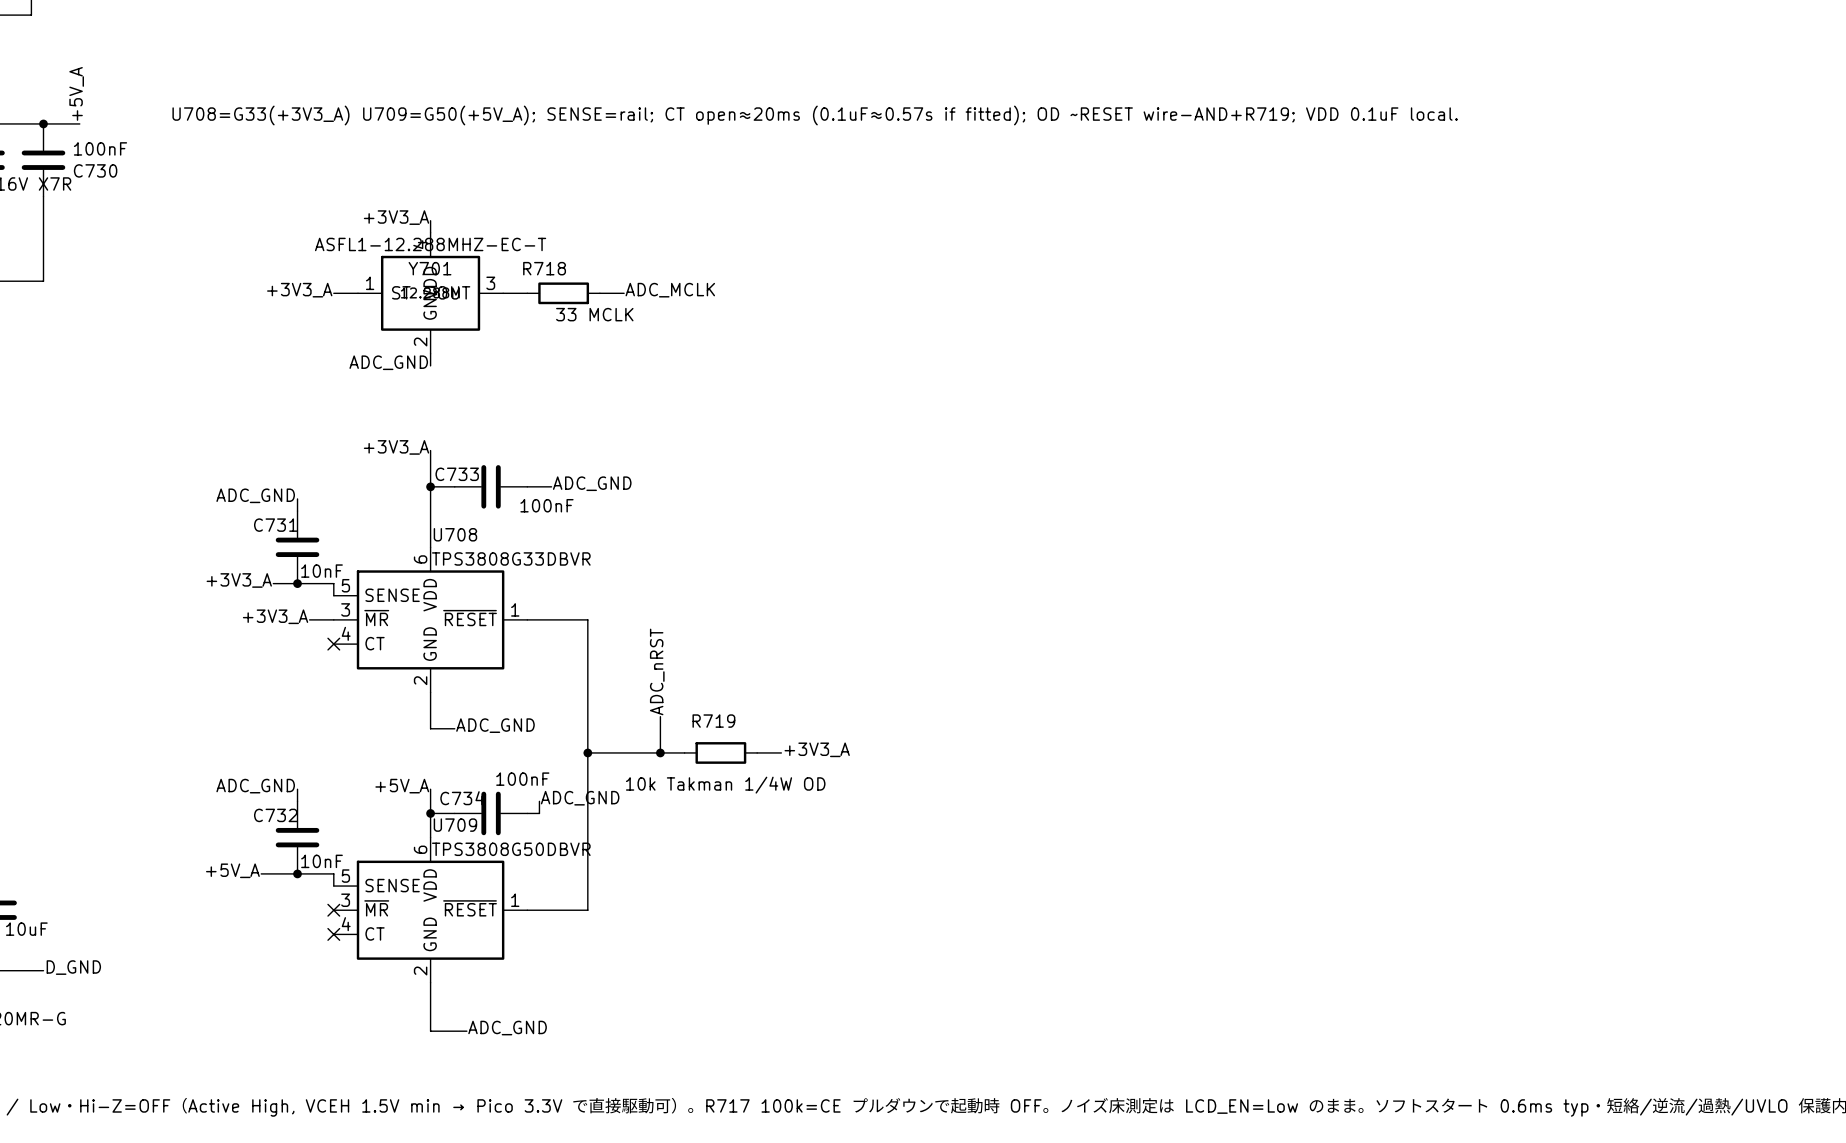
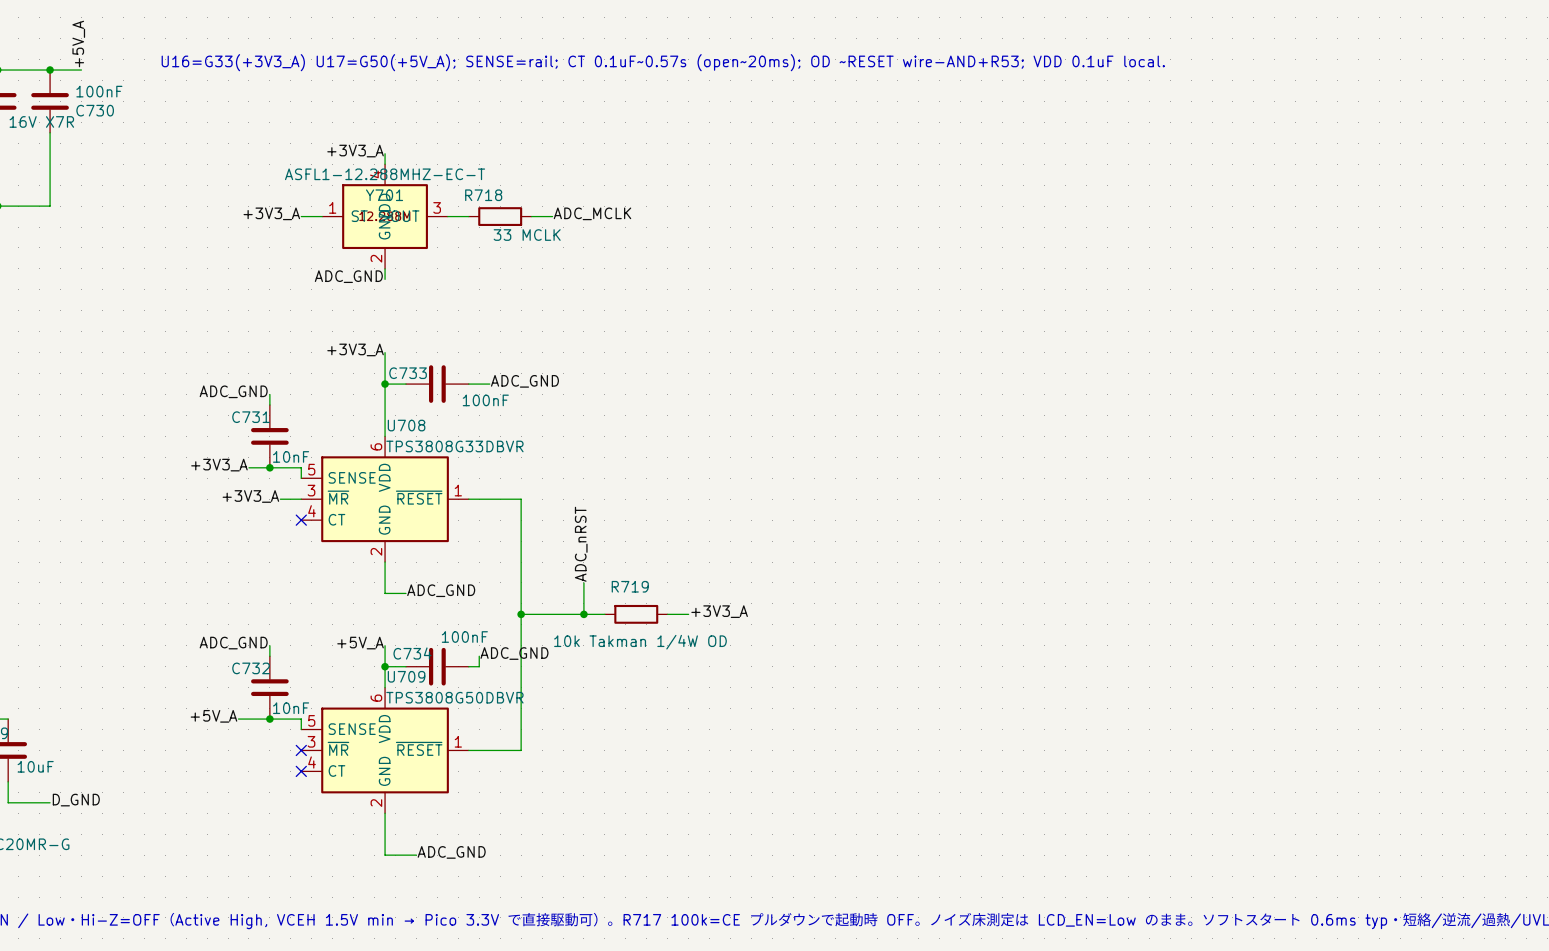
text: U708=G33(+3V3_A) U709=G50(+5V_A); SENSE=rail; CT open≈20ms (0.1uF≈0.57s if fitted); OD ~RESET wire-AND+R719; VDD 0.1uF local. (815, 115) -> U16=G33(+3V3_A) U17=G50(+5V_A); SENSE=rail; CT 0.1uF~0.57s (open~20ms); OD ~RESET wire-AND+R53; VDD 0.1uF local. (663, 62)

